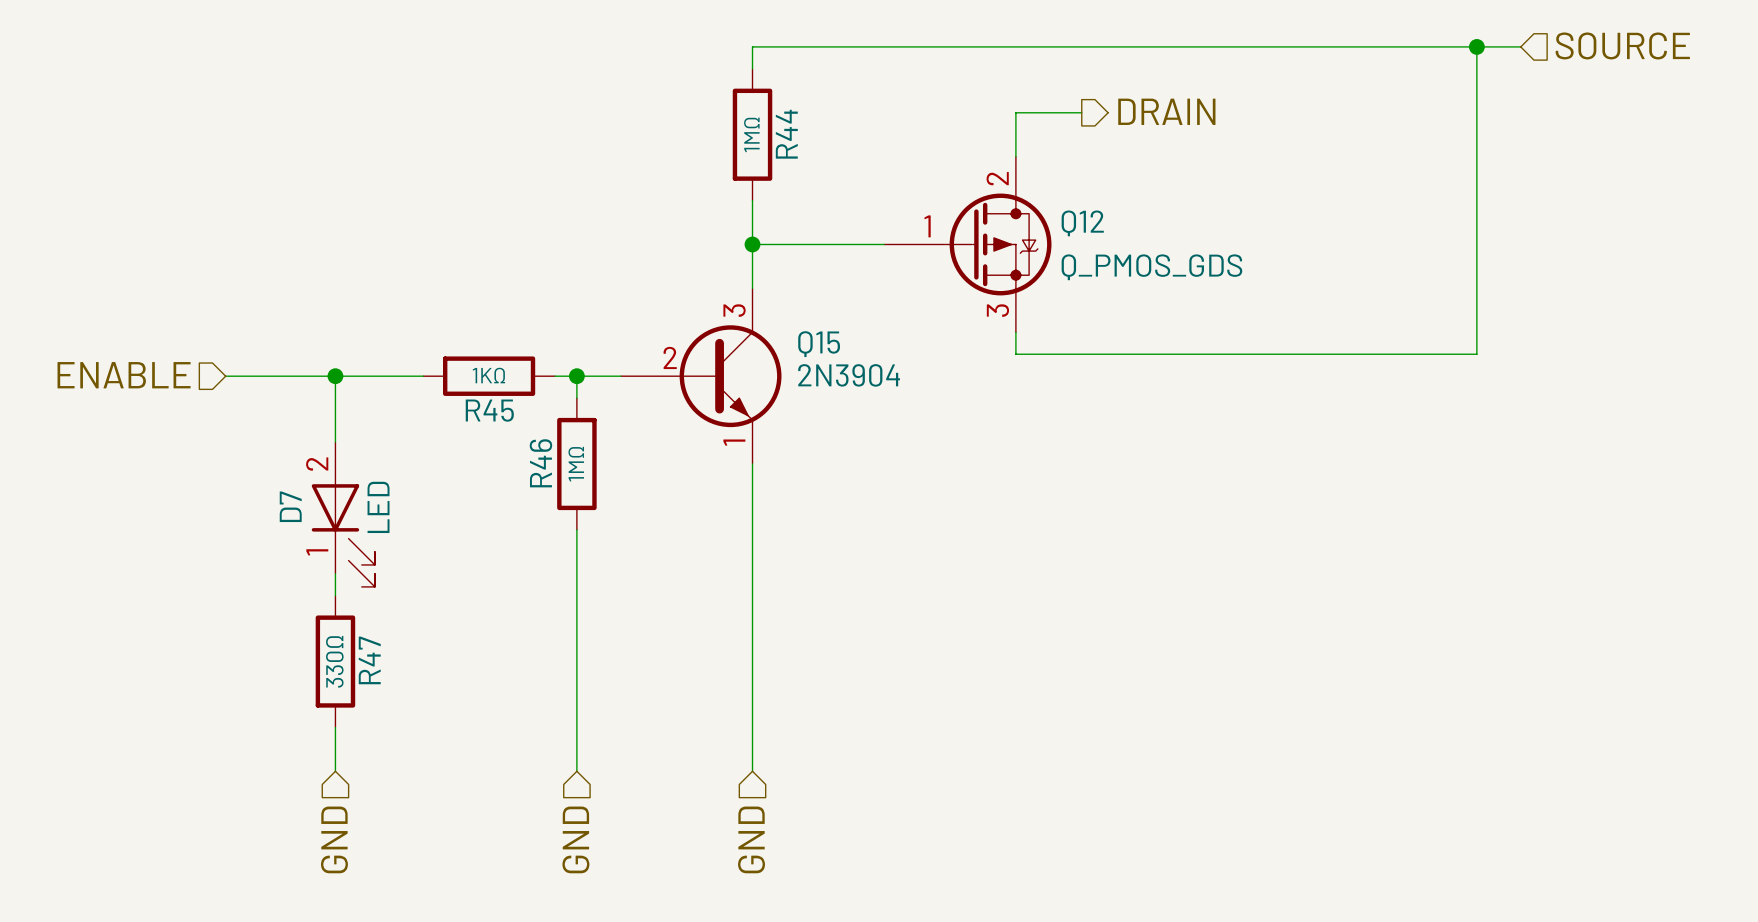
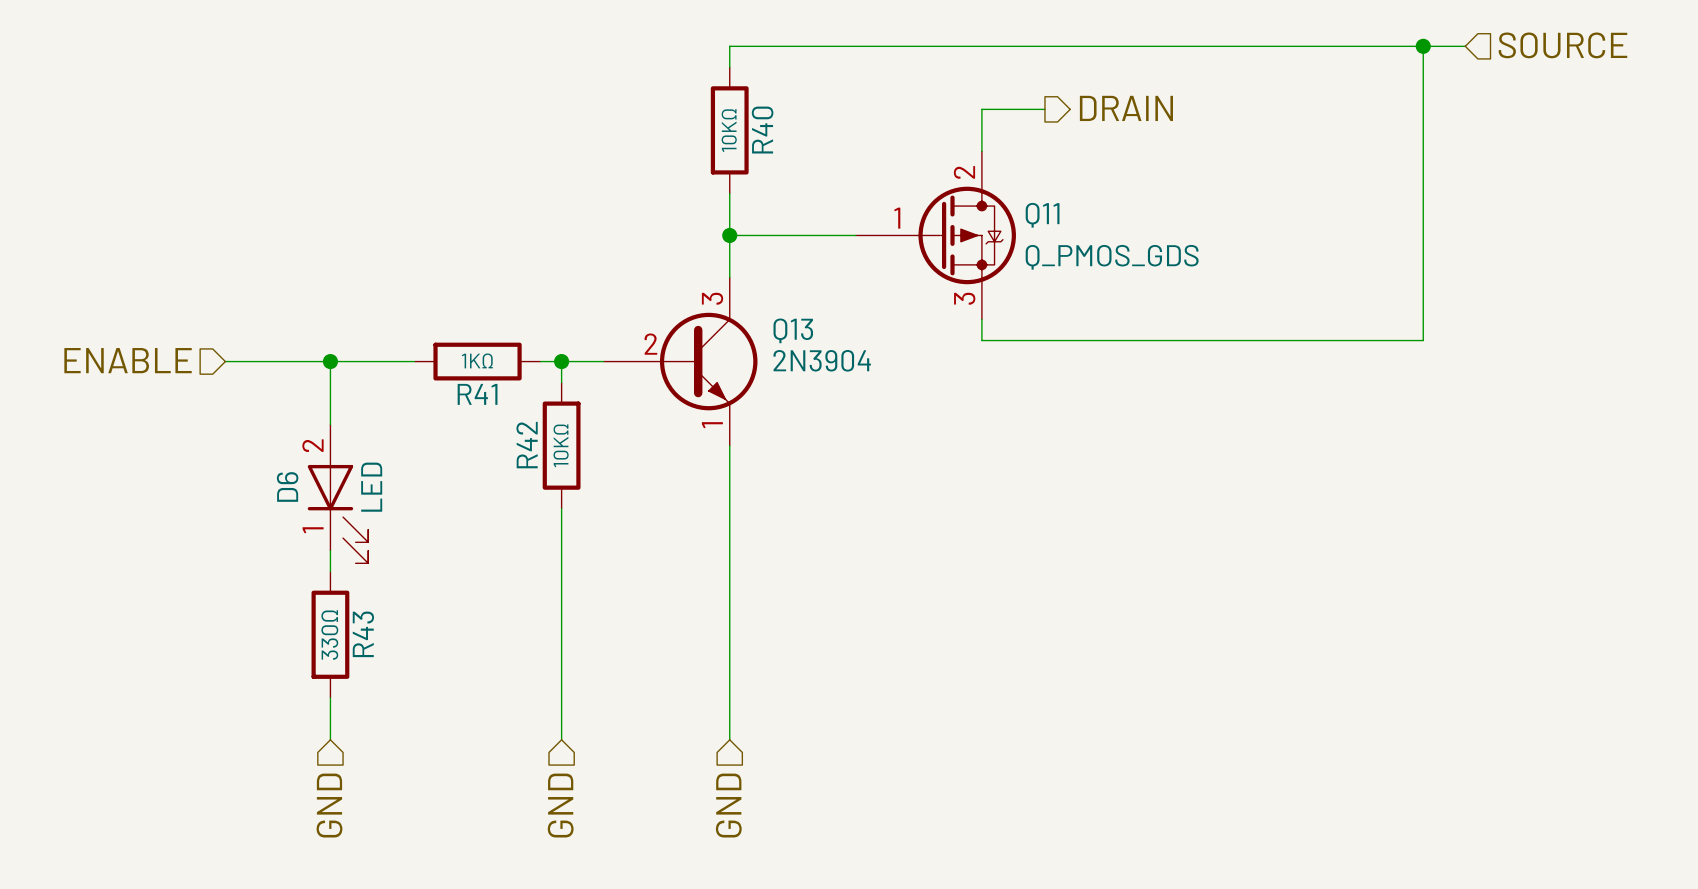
R44 value: 1MΩ (751, 134) -> 10KΩ (729, 130)
R44 name: R44 (786, 134) -> R40 (762, 130)
Q12 name: Q12 (1082, 223) -> Q11 (1042, 215)
Q15 name: Q15 (819, 344) -> Q13 (793, 330)
R45 name: R45 (489, 410) -> R41 (477, 394)
R46 name: R46 (540, 463) -> R42 (527, 445)
R46 value: 1MΩ (576, 464) -> 10KΩ (561, 445)
D7 name: D7 (290, 506) -> D6 (287, 486)
R47 name: R47 (369, 660) -> R43 (363, 634)

